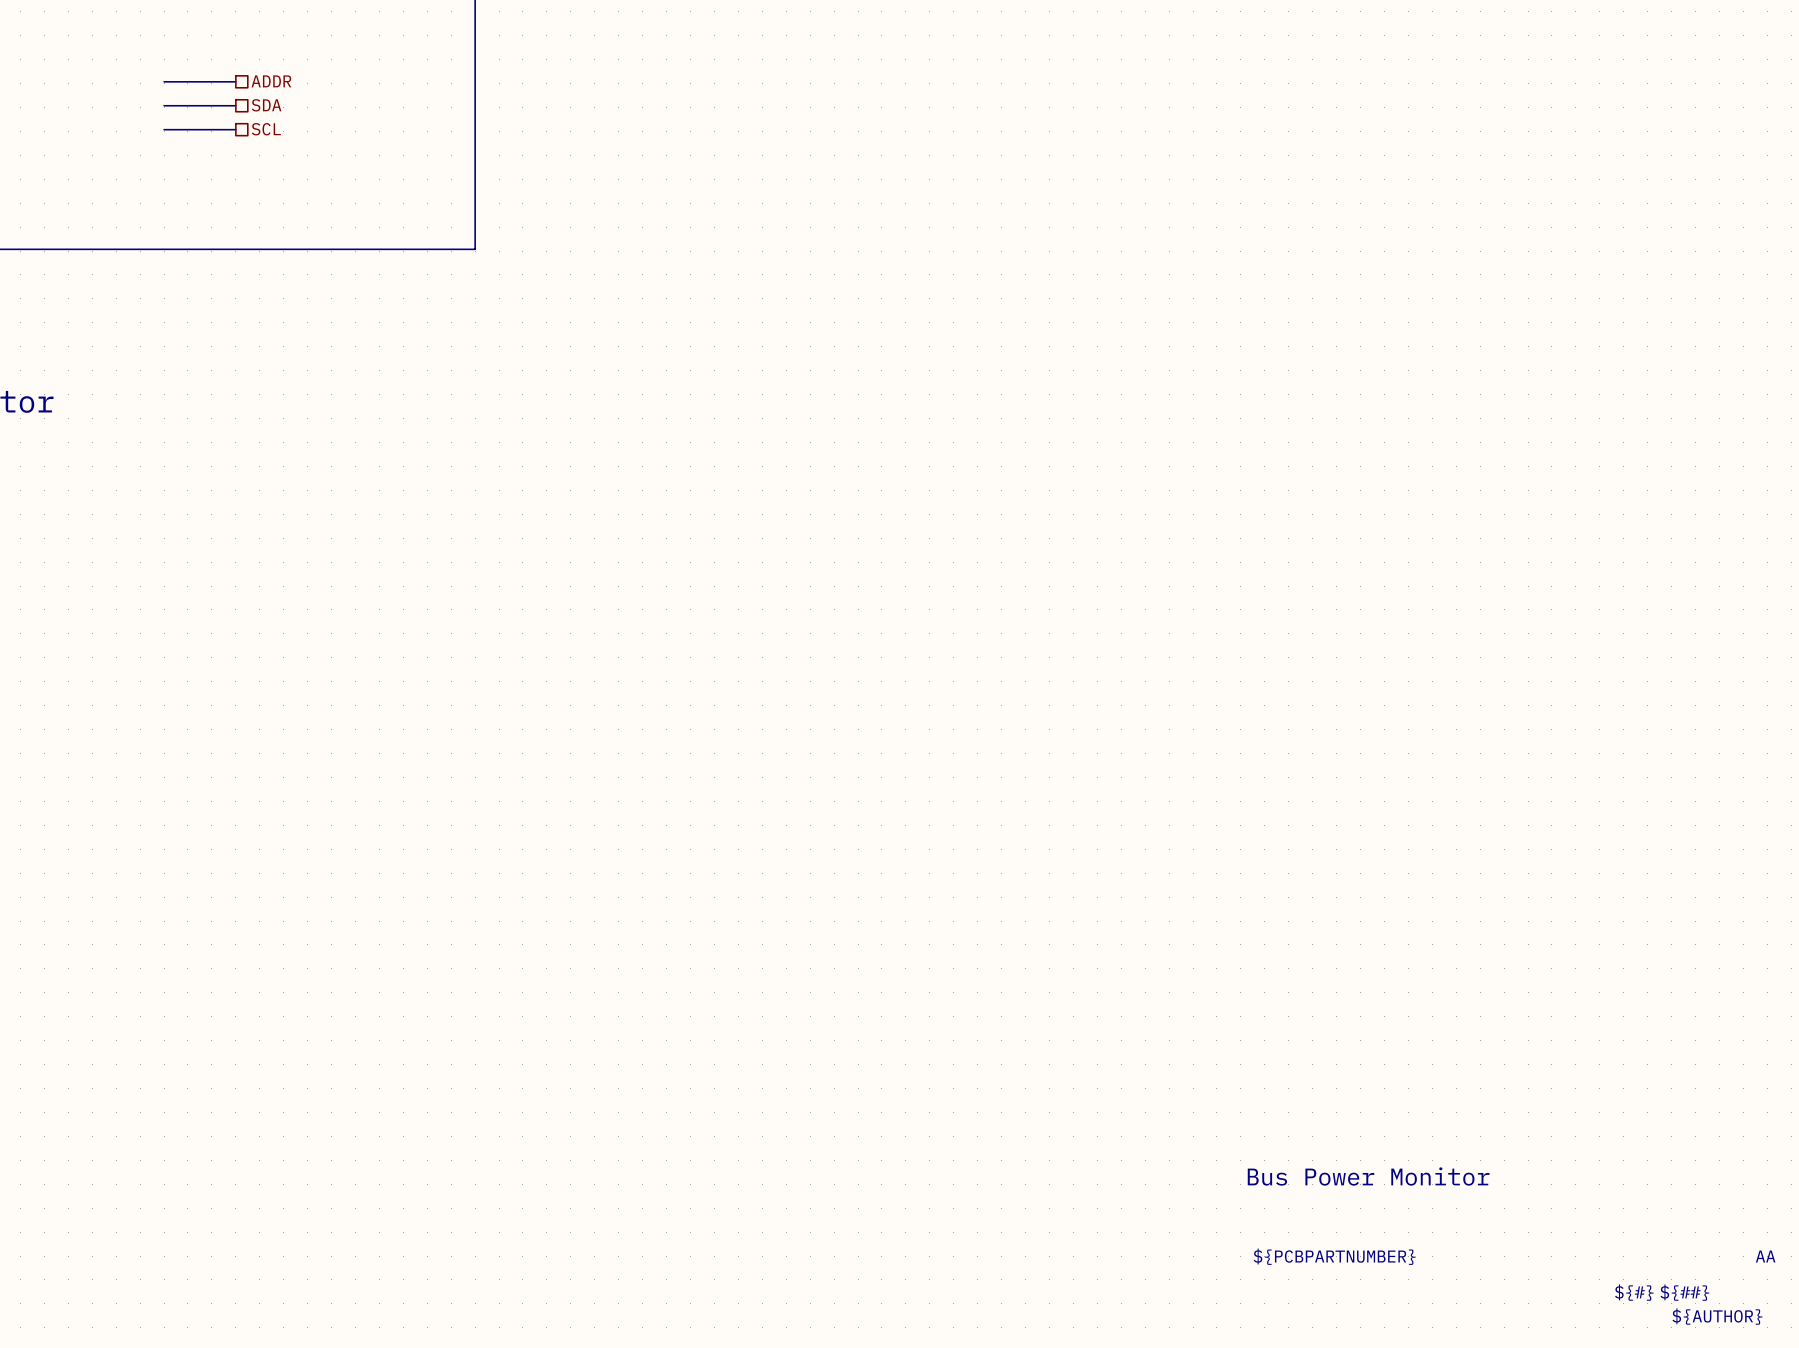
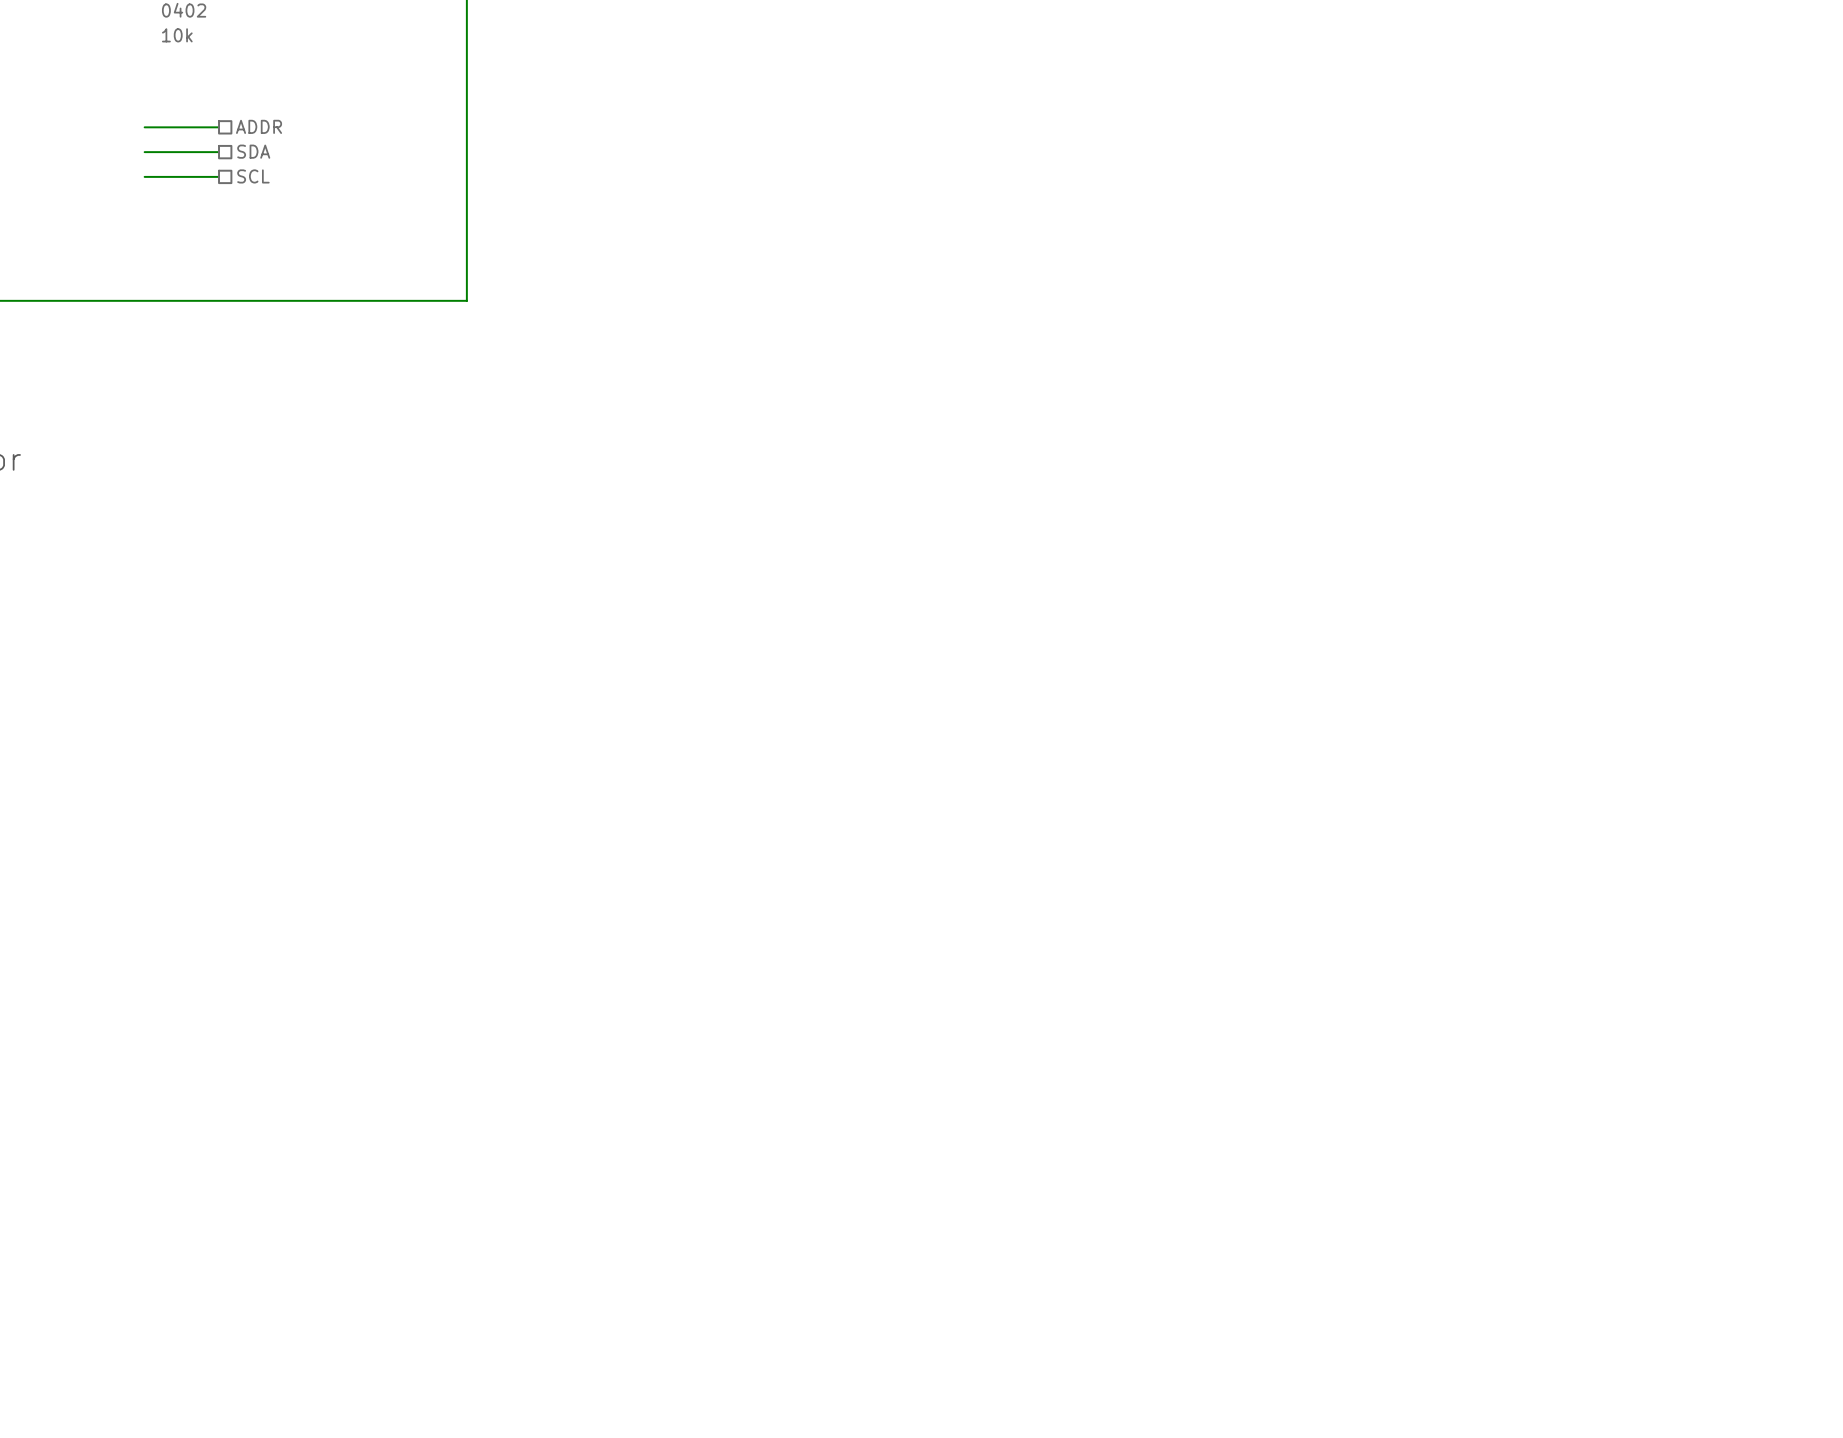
text: Bus Power Monitor (1368, 1176) -> none
text: ${PCBPARTNUMBER} (1334, 1256) -> none
text: AA (1765, 1256) -> none
text: ${#} (1634, 1292) -> none
text: ${##} (1684, 1292) -> none
text: ${AUTHOR} (1717, 1316) -> none

